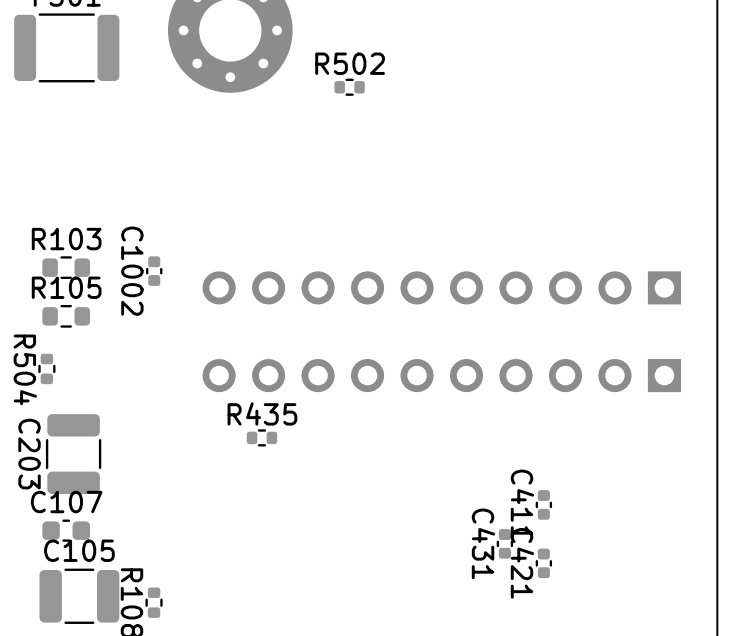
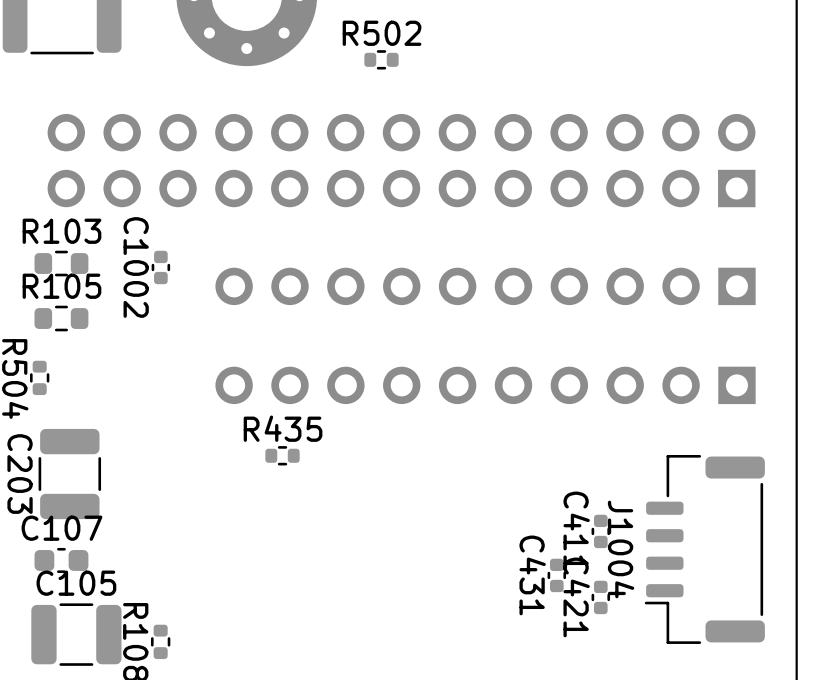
part: none -> (401, 160)
J1004: none -> (704, 549)

